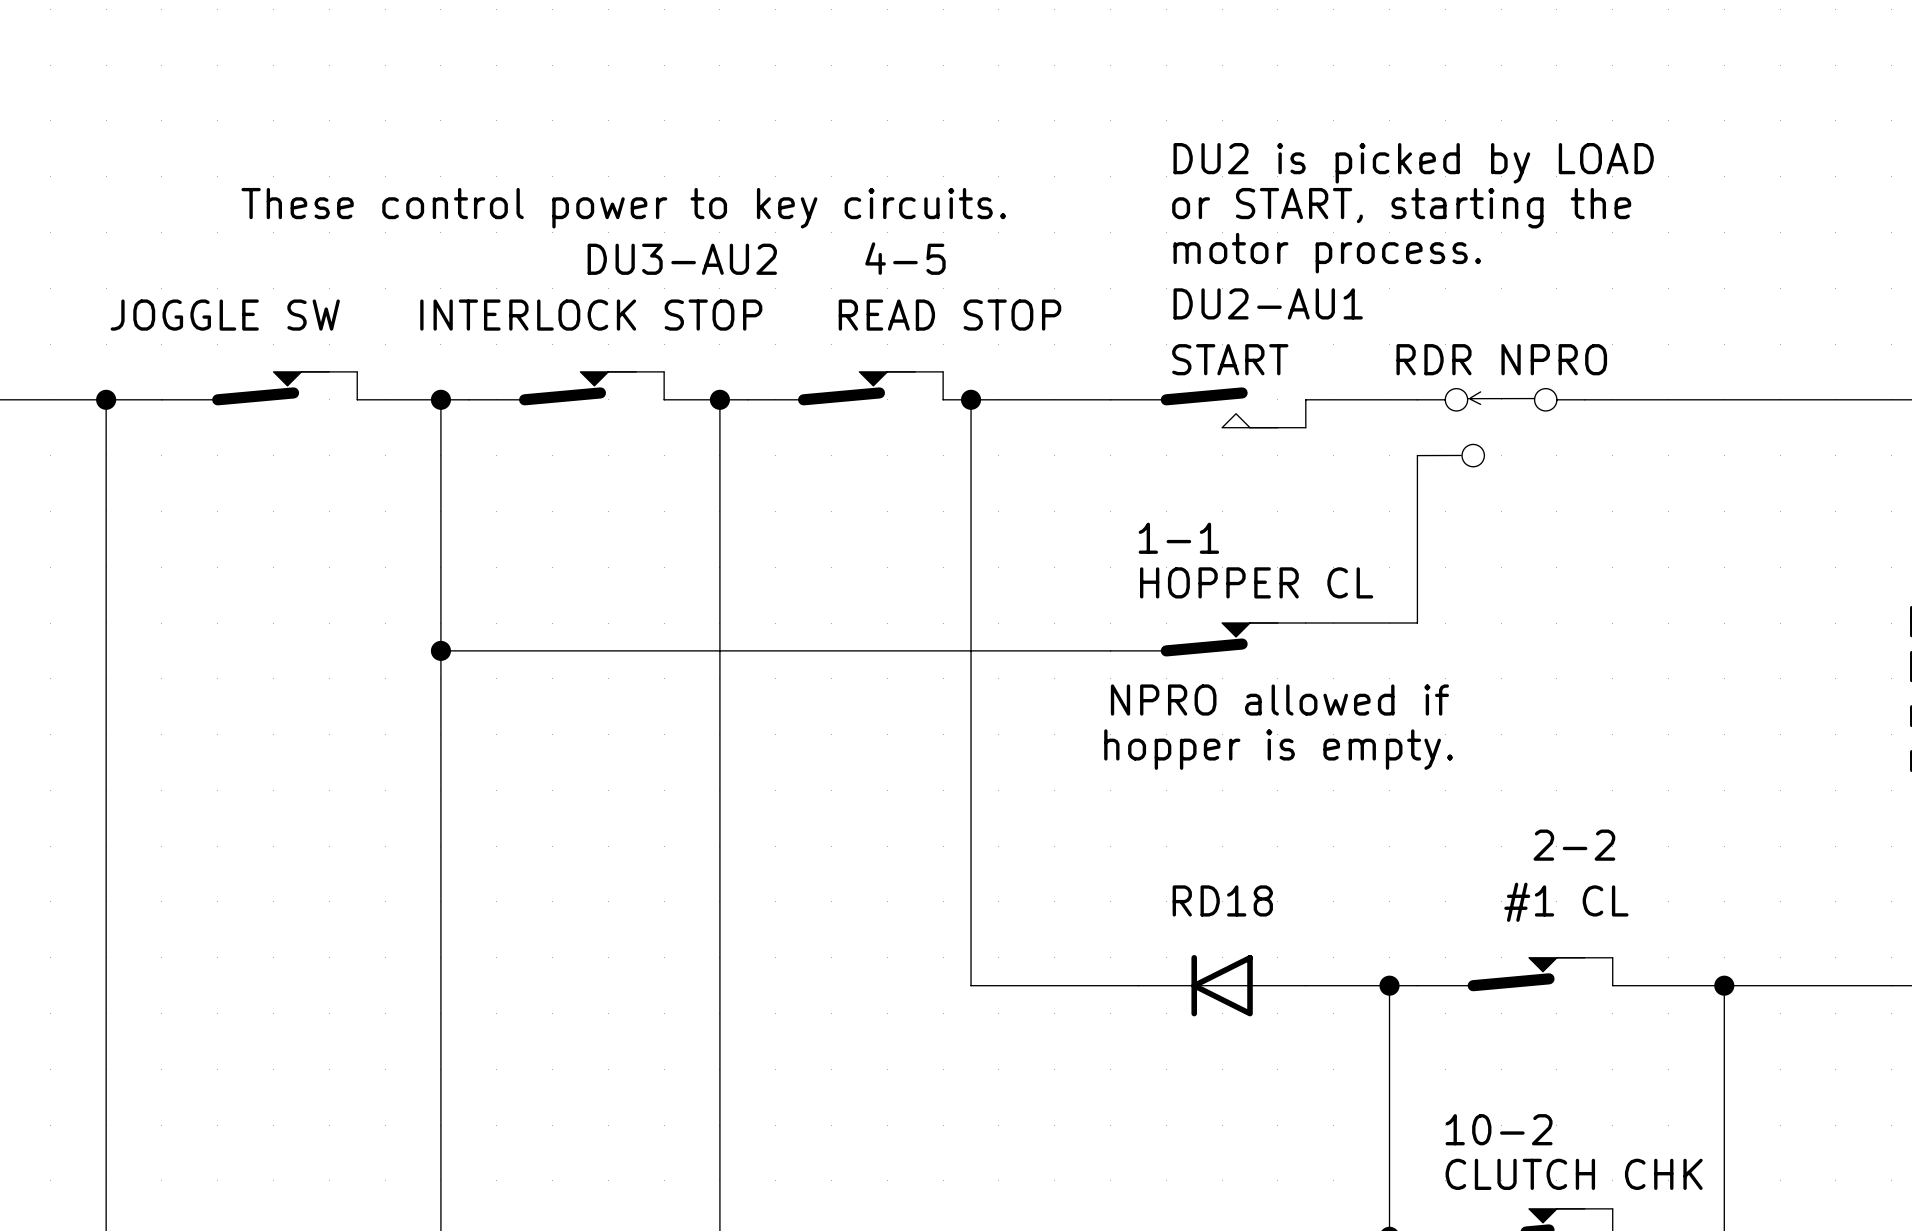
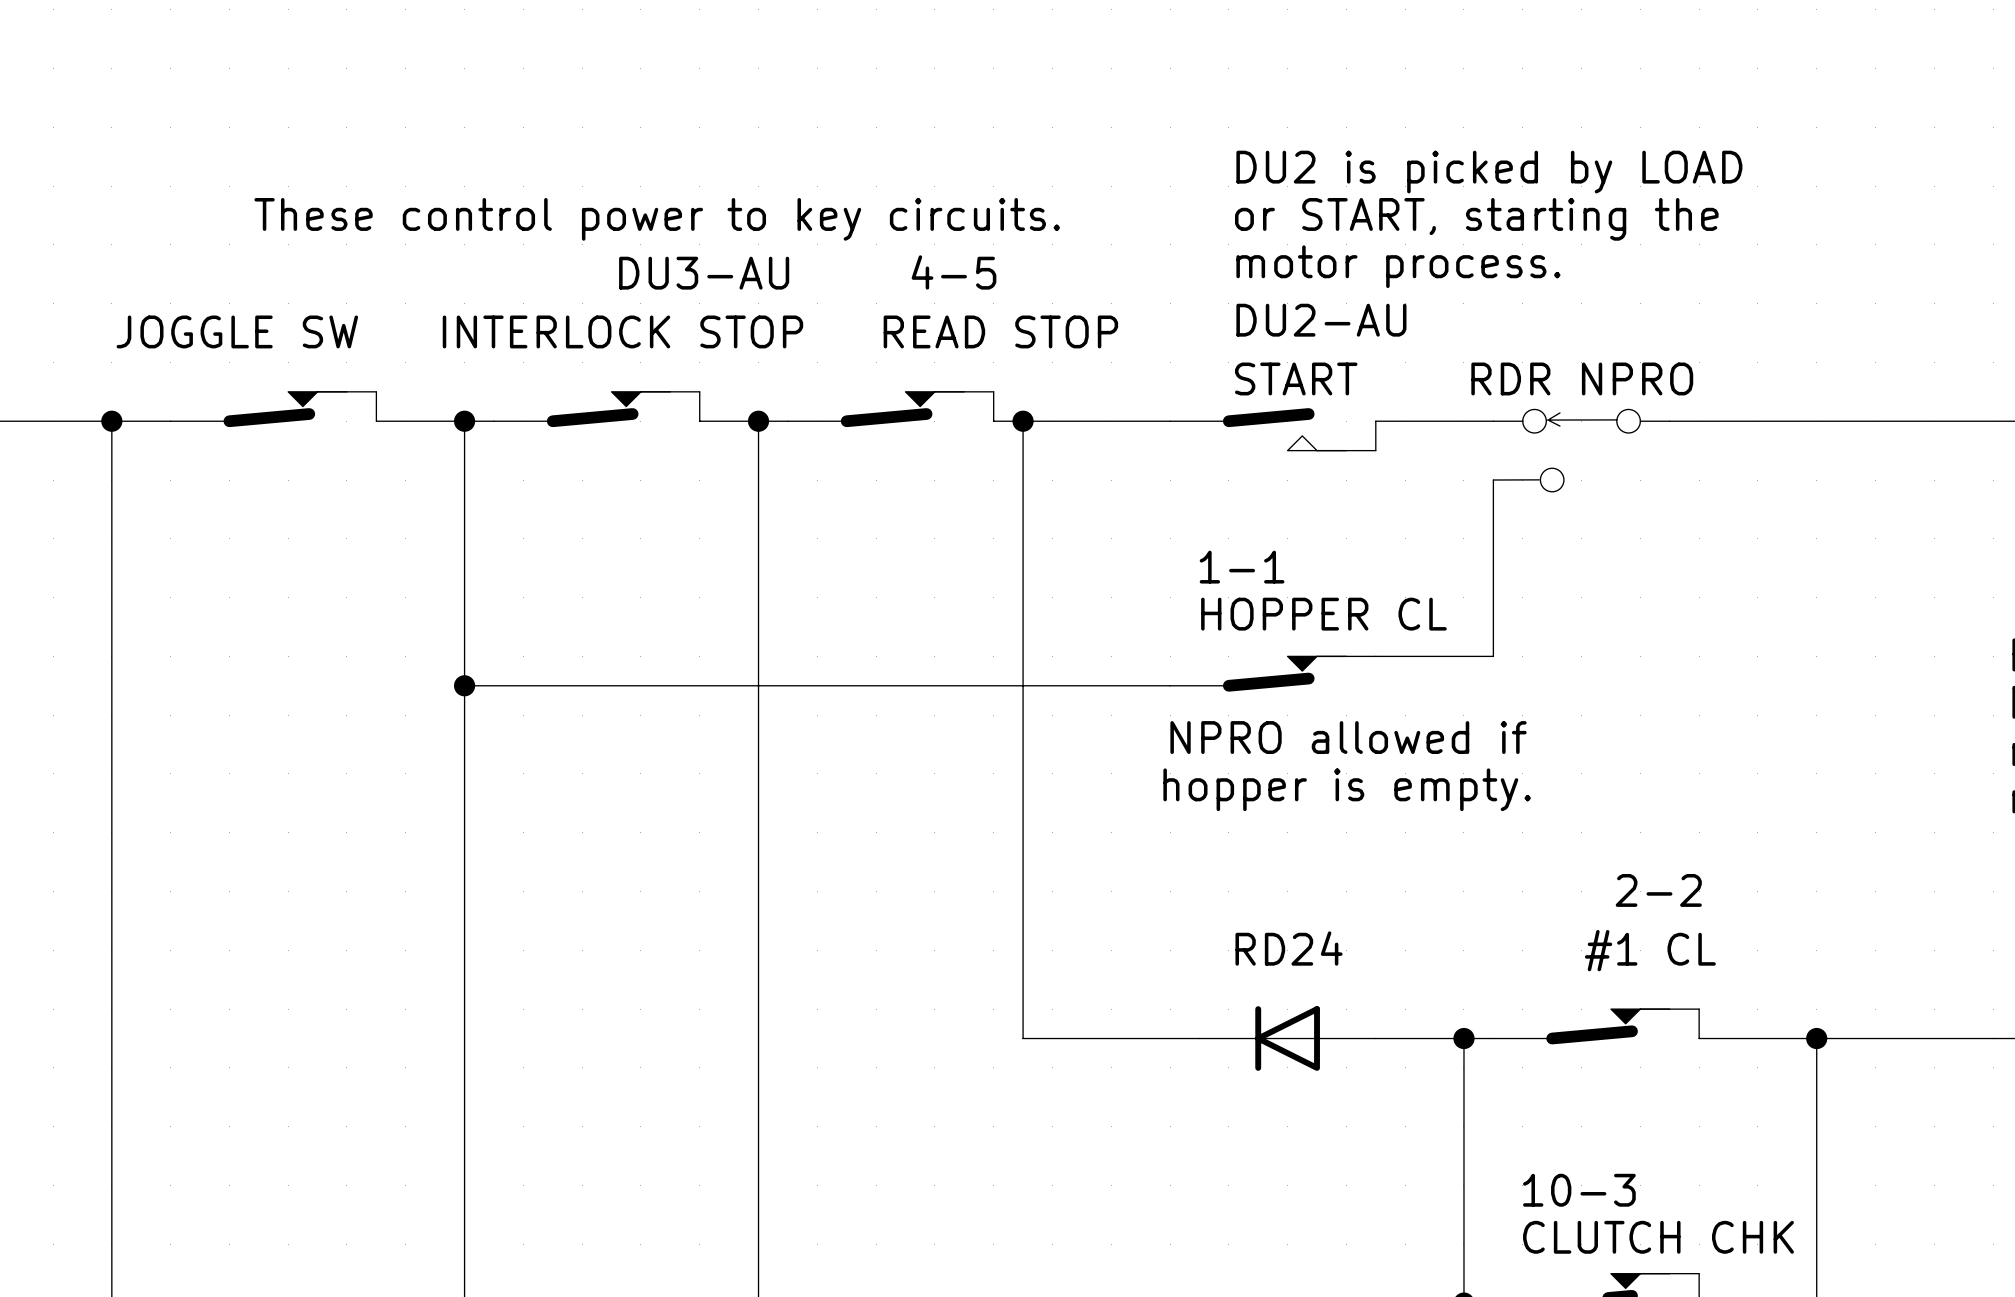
DU3-AU2 name: DU3-AU2 (682, 259) -> DU3-AU (704, 273)
DU2-AU1 name: DU2-AU1 (1268, 303) -> DU2-AU (1321, 320)
RD18 name: RD18 (1222, 900) -> RD24 (1289, 948)
10-2 name: 10-2 (1499, 1129) -> 10-3 (1579, 1190)

